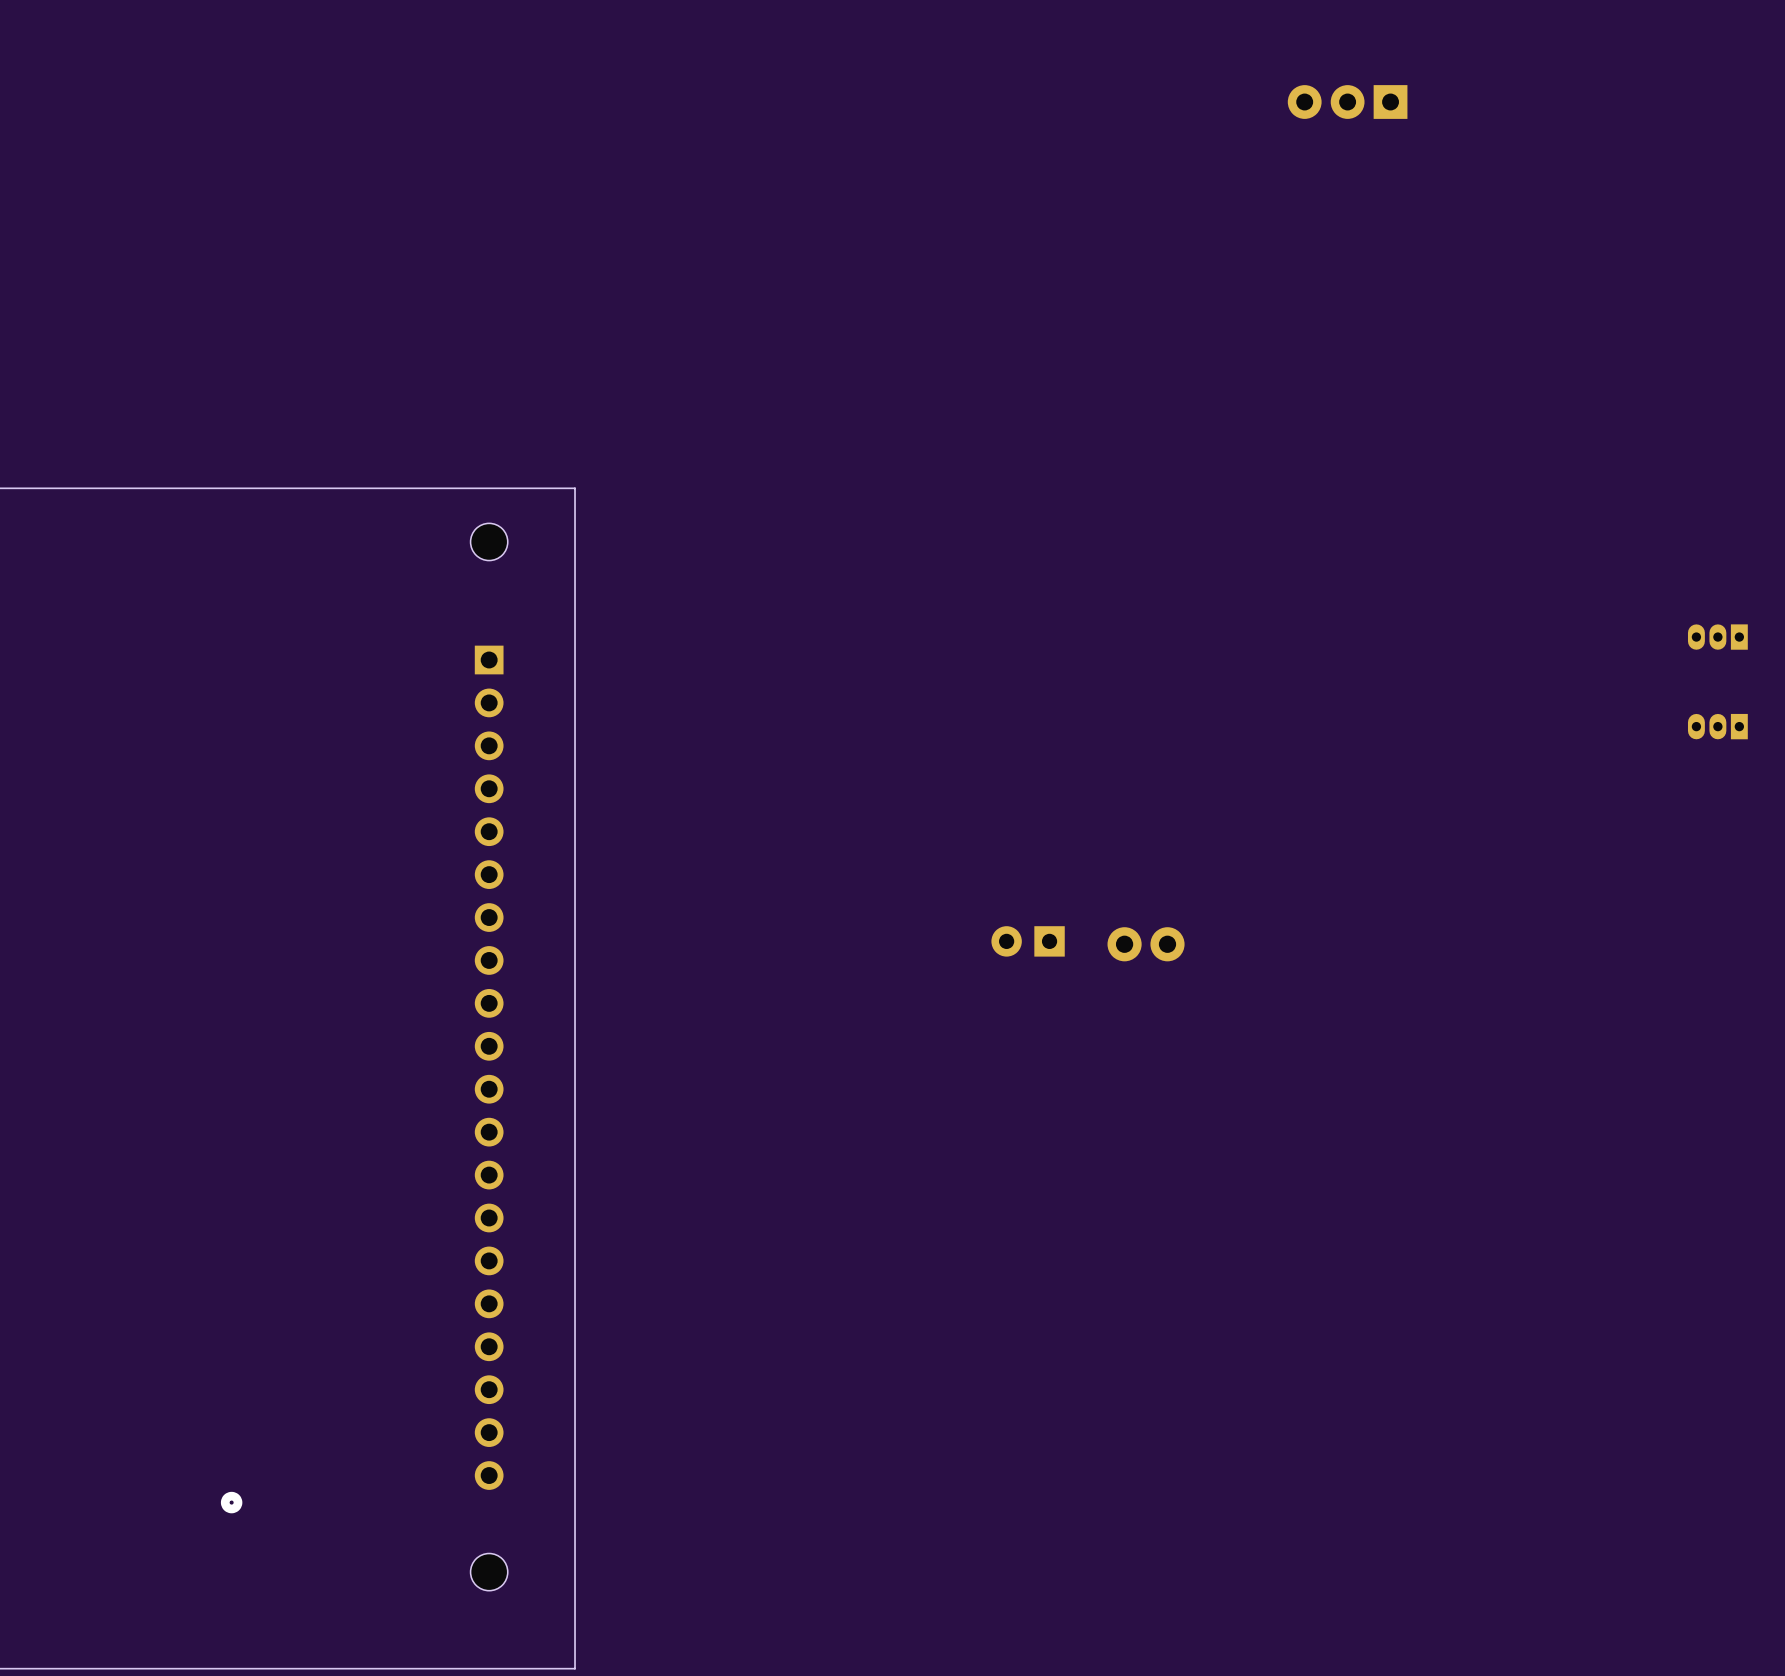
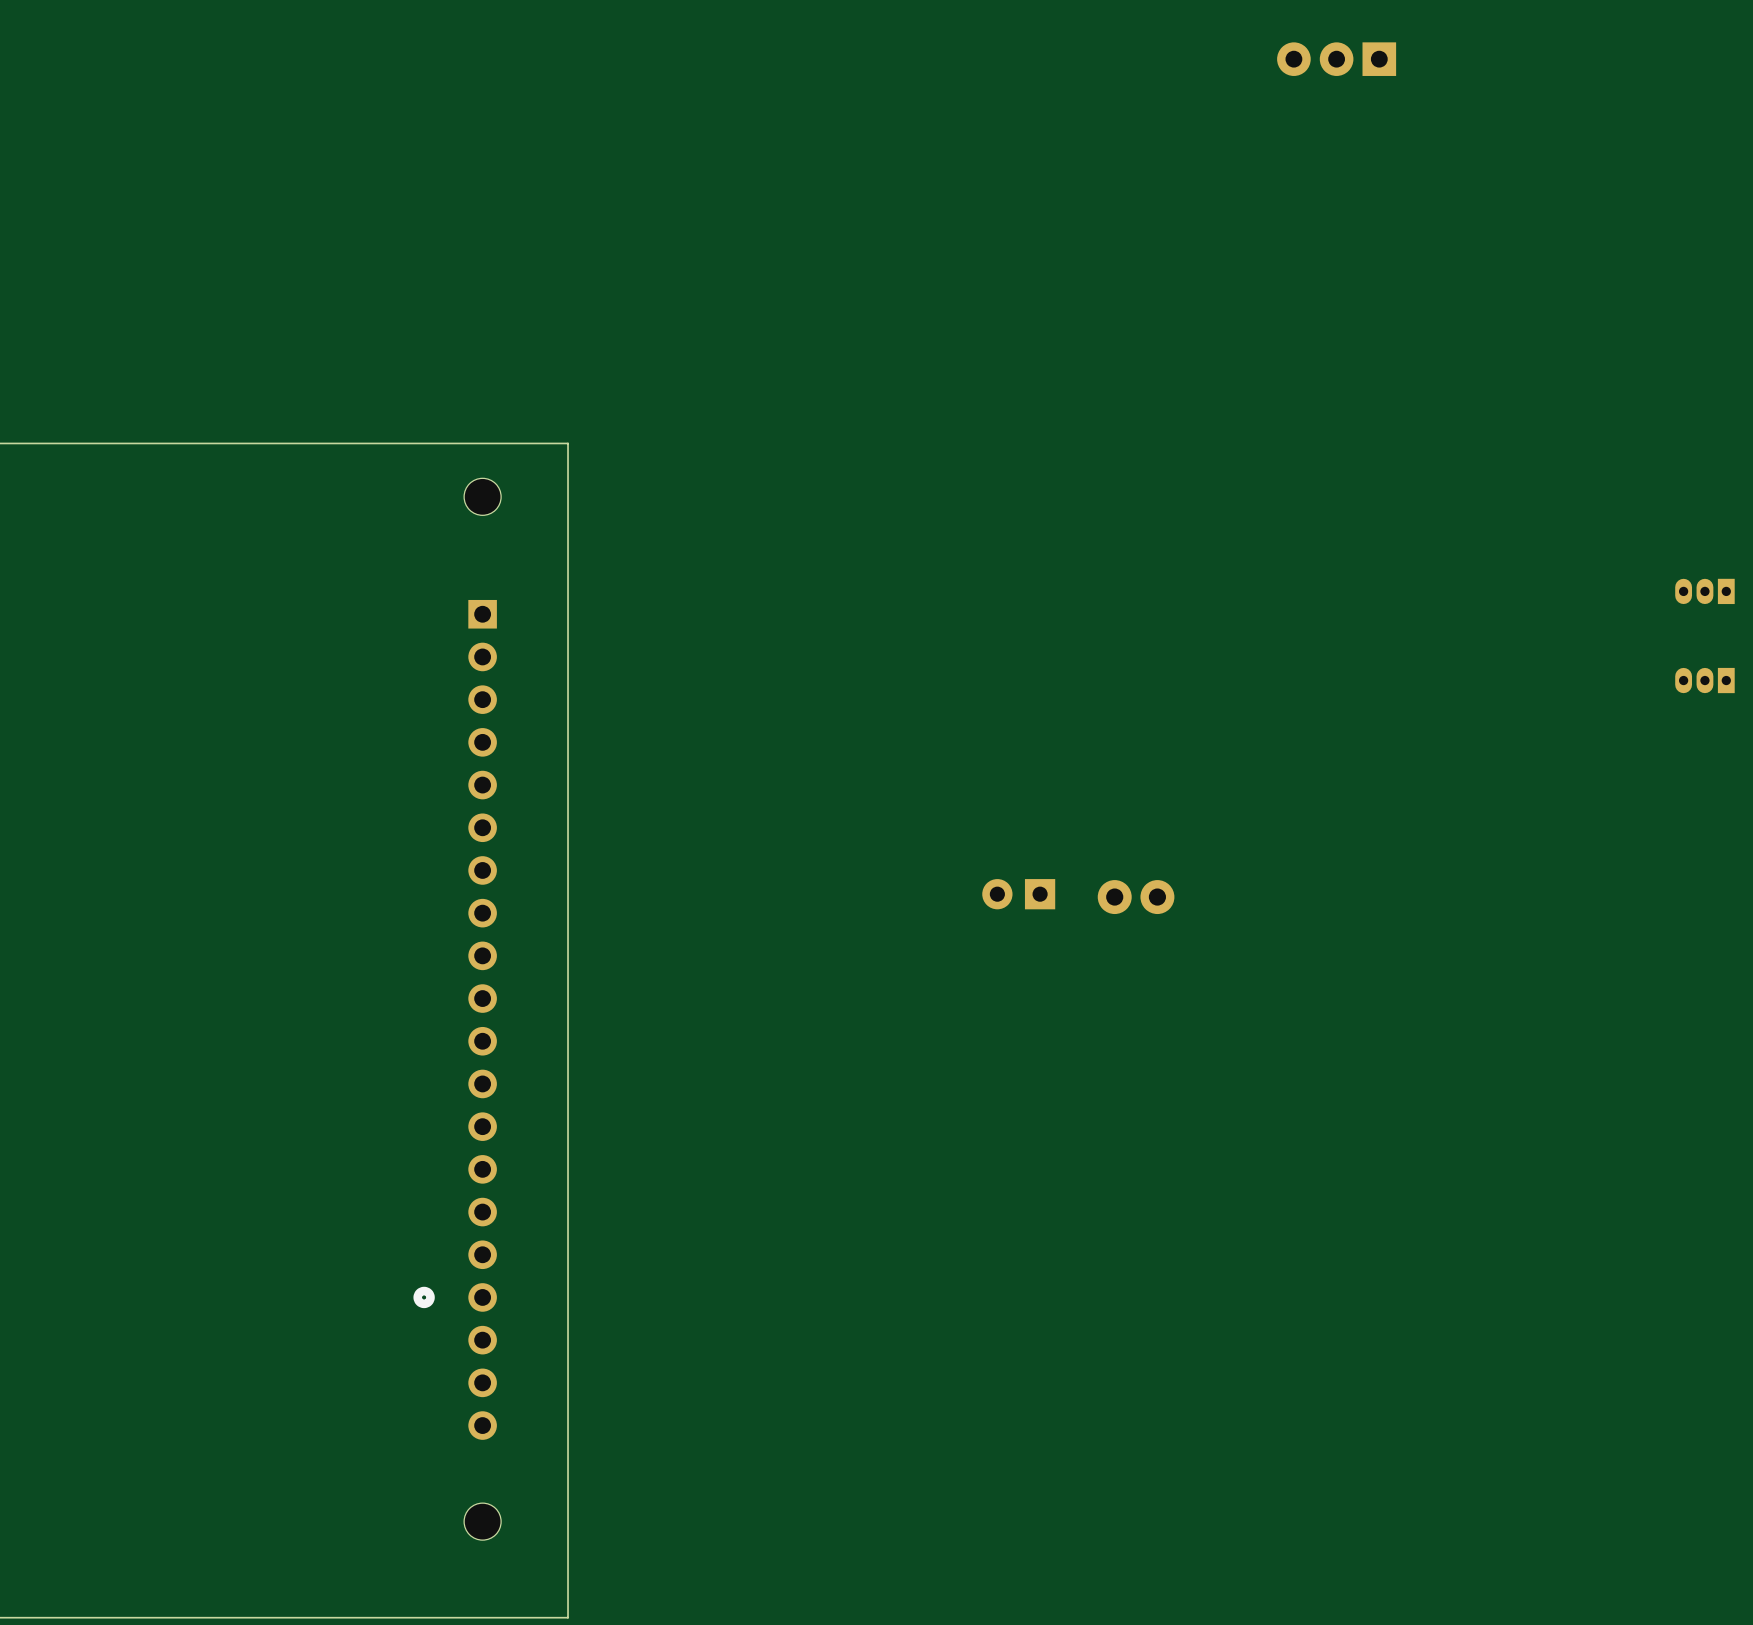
part position: (231, 1502) -> (424, 1297)

